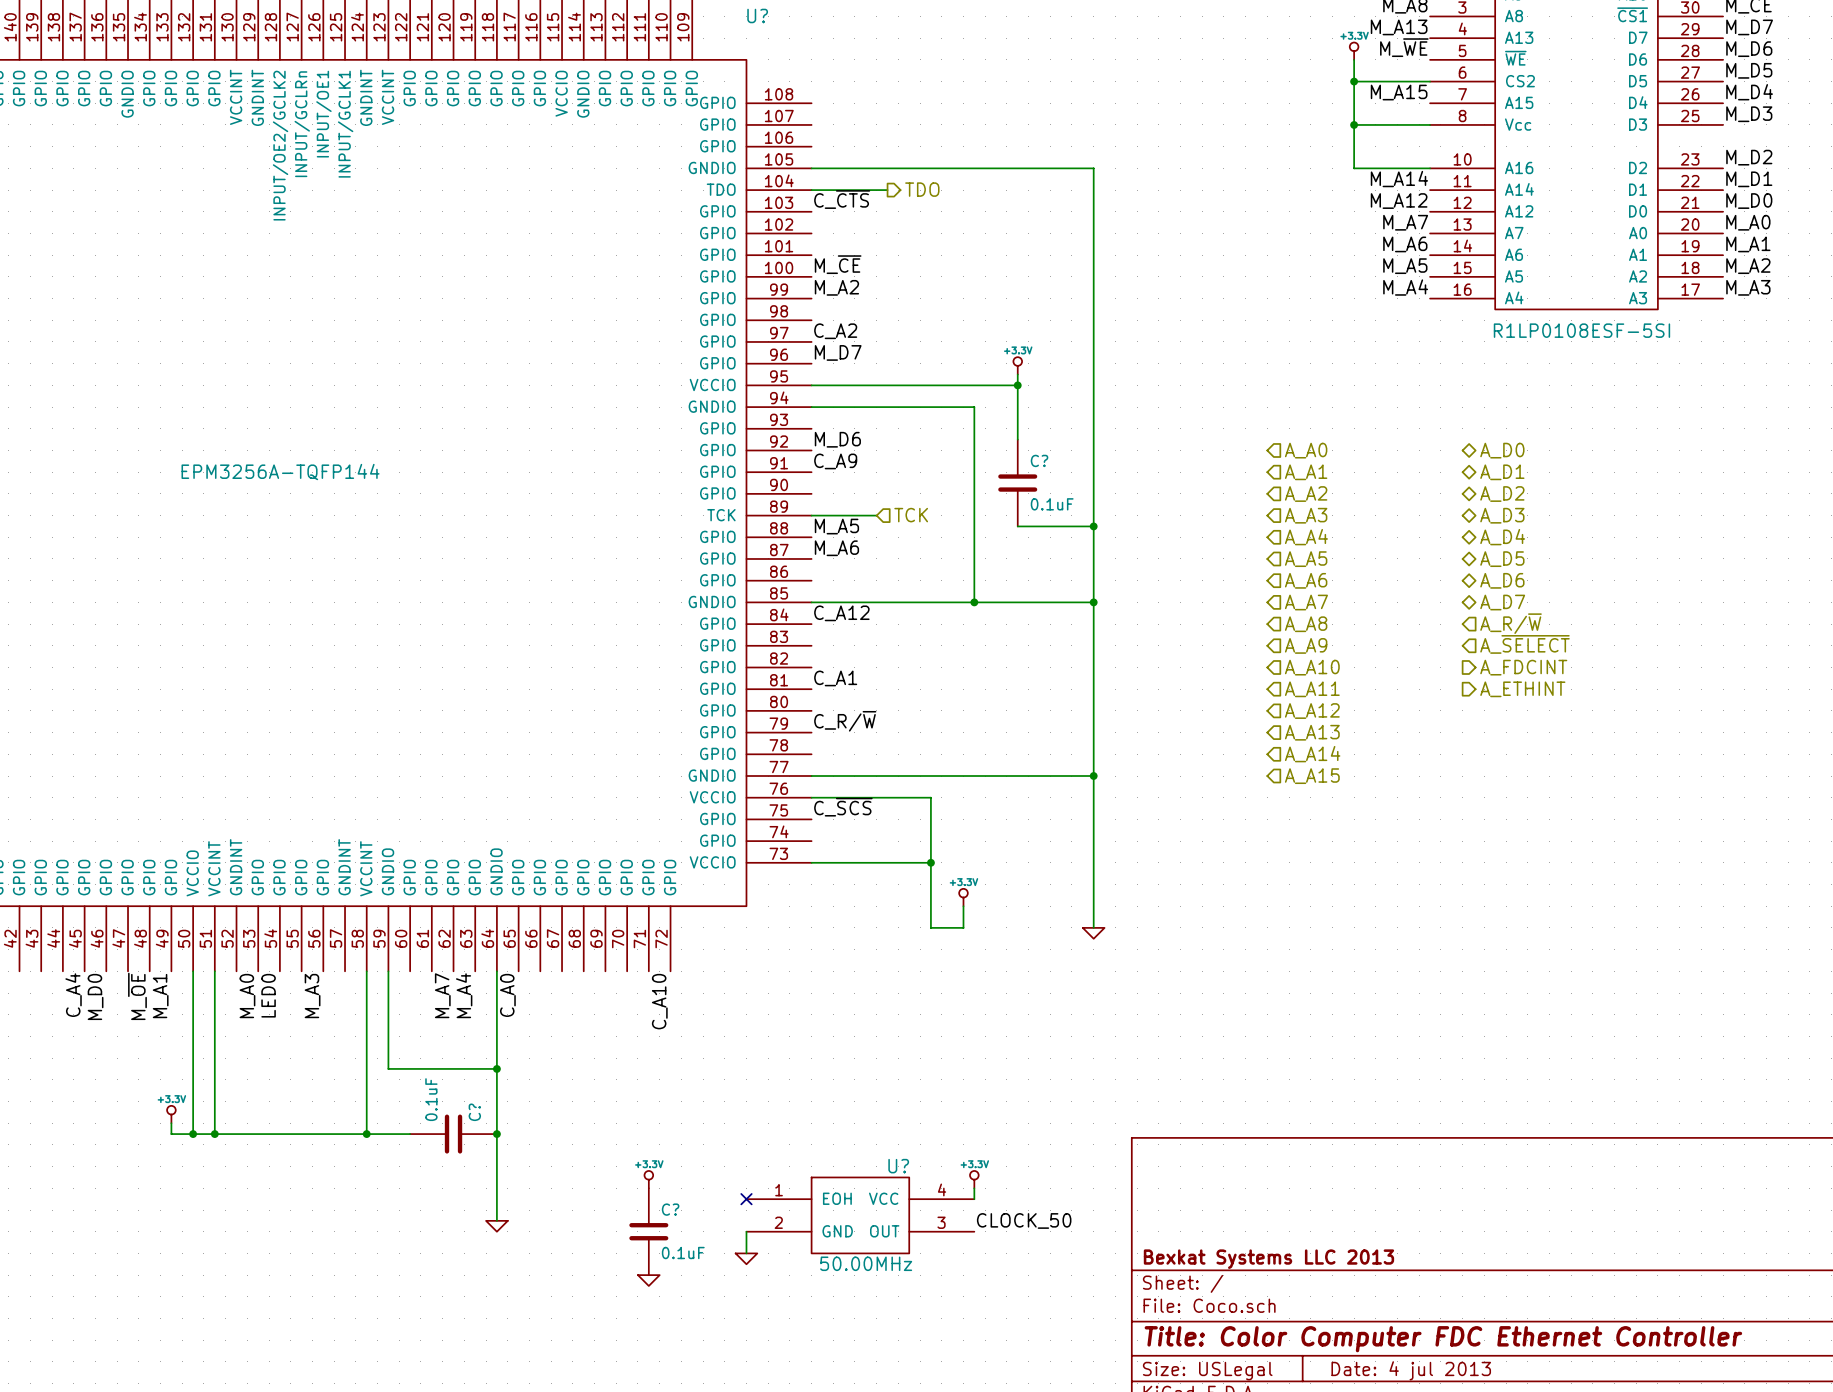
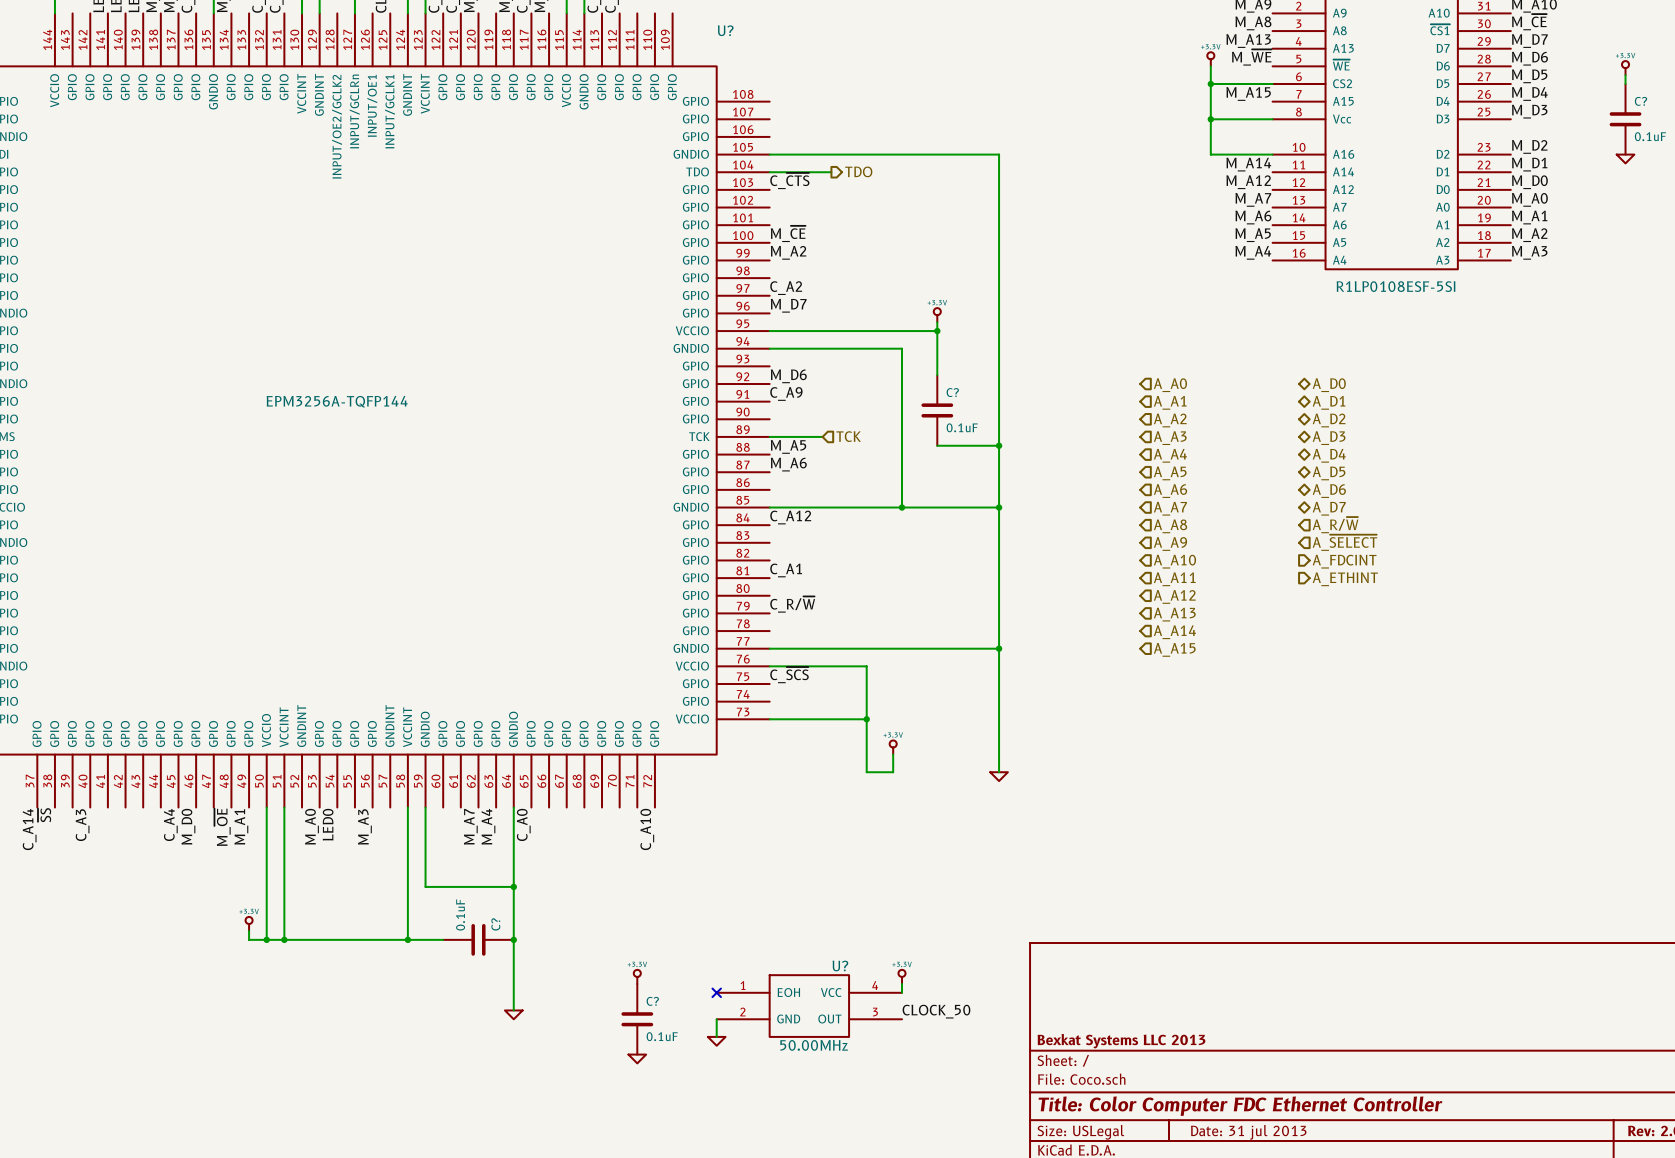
title block: Date: 4 jul 2013 (1411, 1370) -> Date: 31 jul 2013 (1248, 1132)

